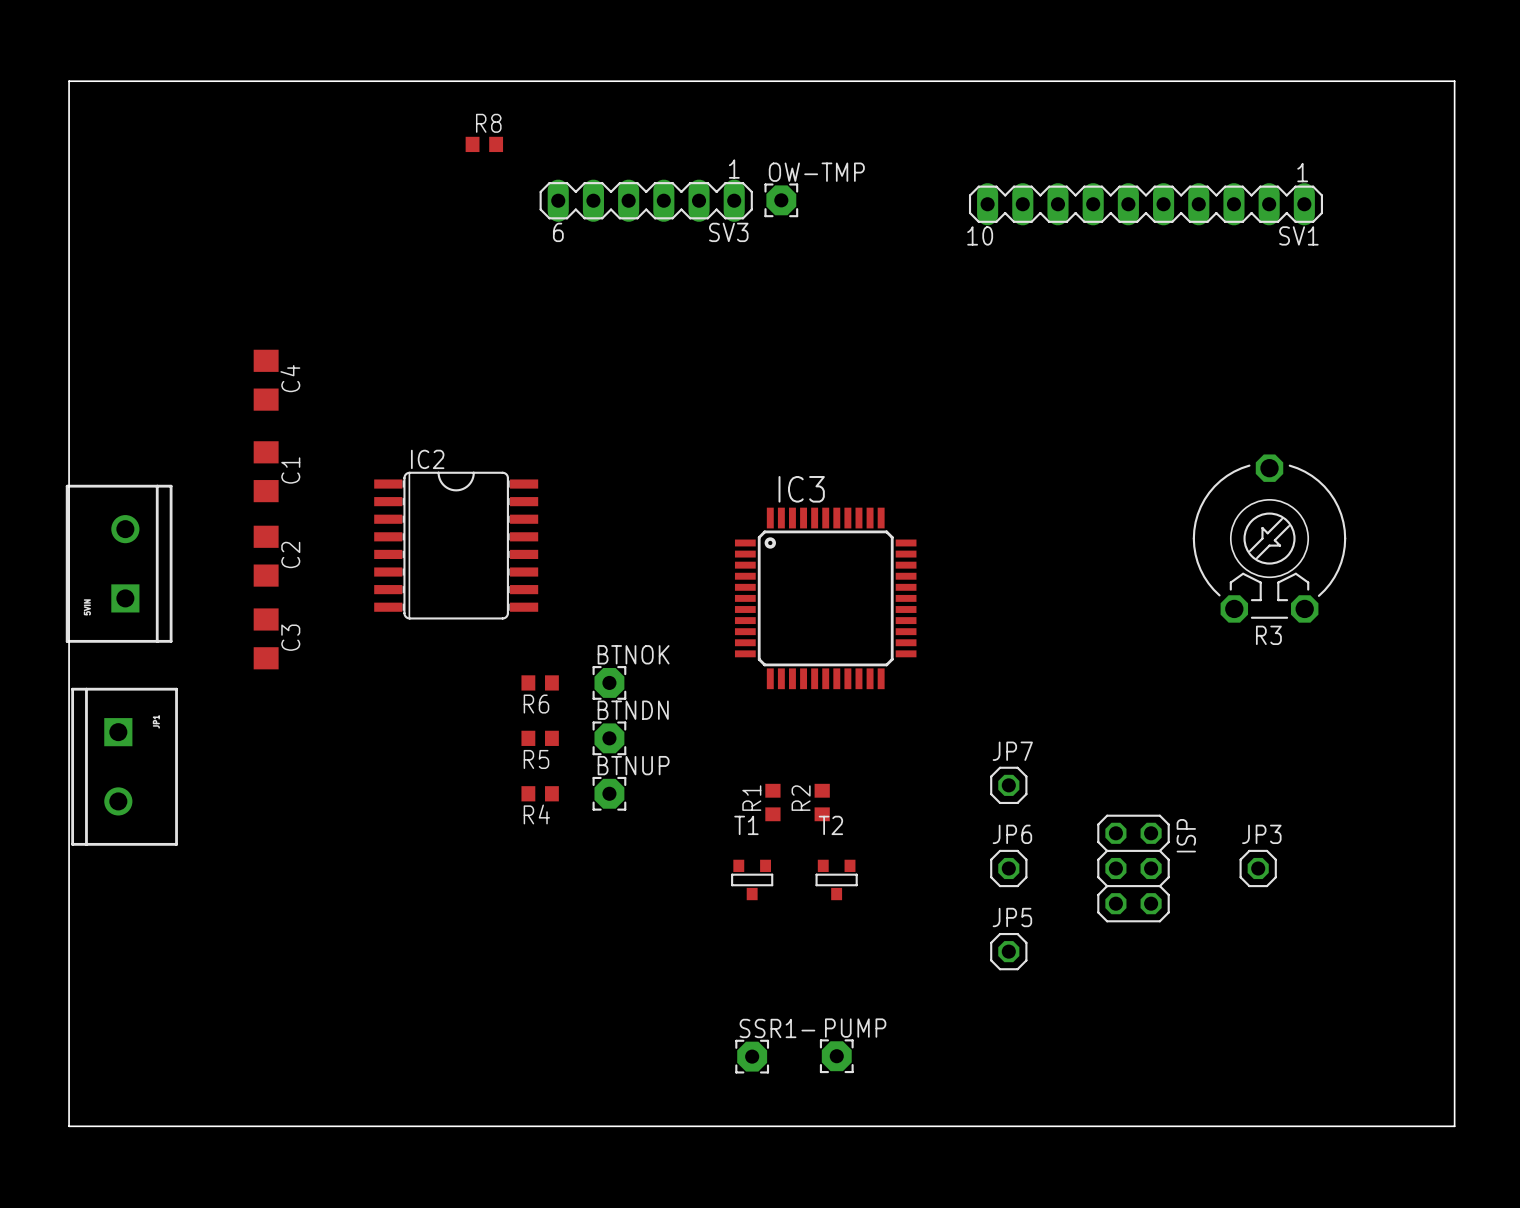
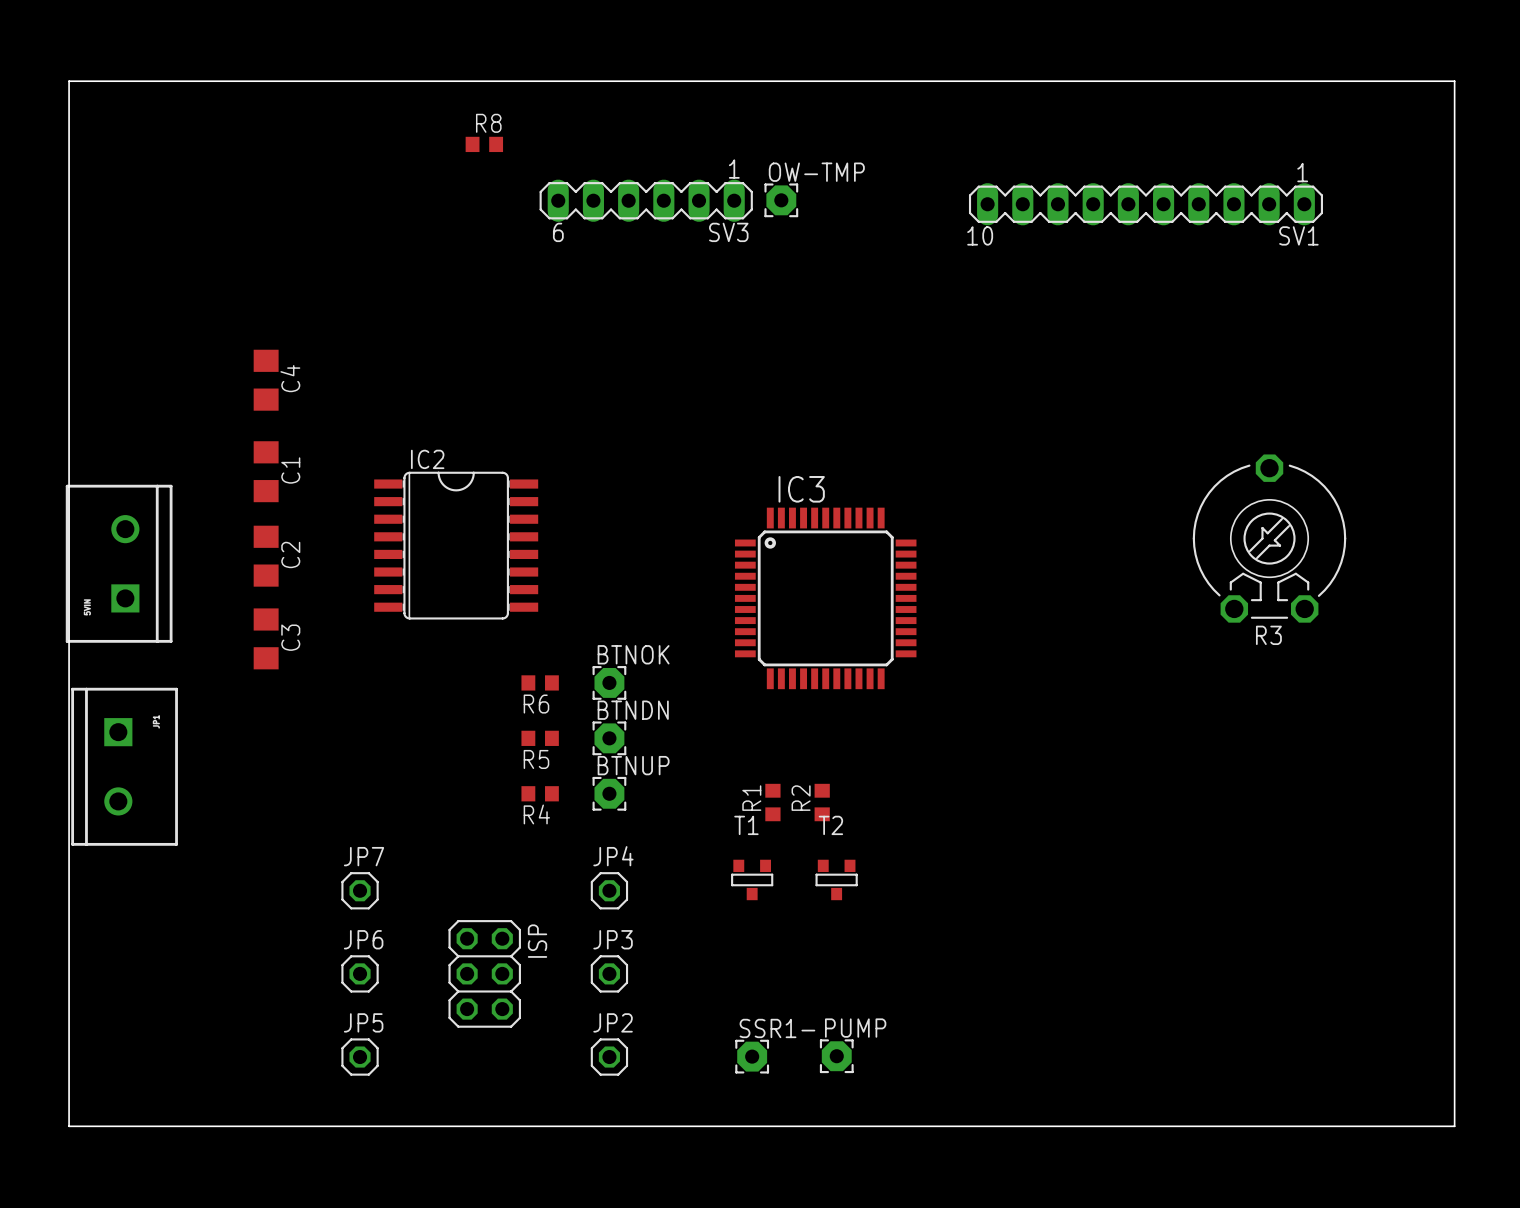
JP7 position: (1008, 785) -> (360, 890)
JP6 position: (1008, 868) -> (360, 973)
ISP: (1133, 868) -> none
JP3 position: (1258, 868) -> (609, 973)
JP4: none -> (609, 890)
JP5 position: (1008, 951) -> (360, 1057)
ISP: none -> (484, 973)
JP2: none -> (609, 1057)

